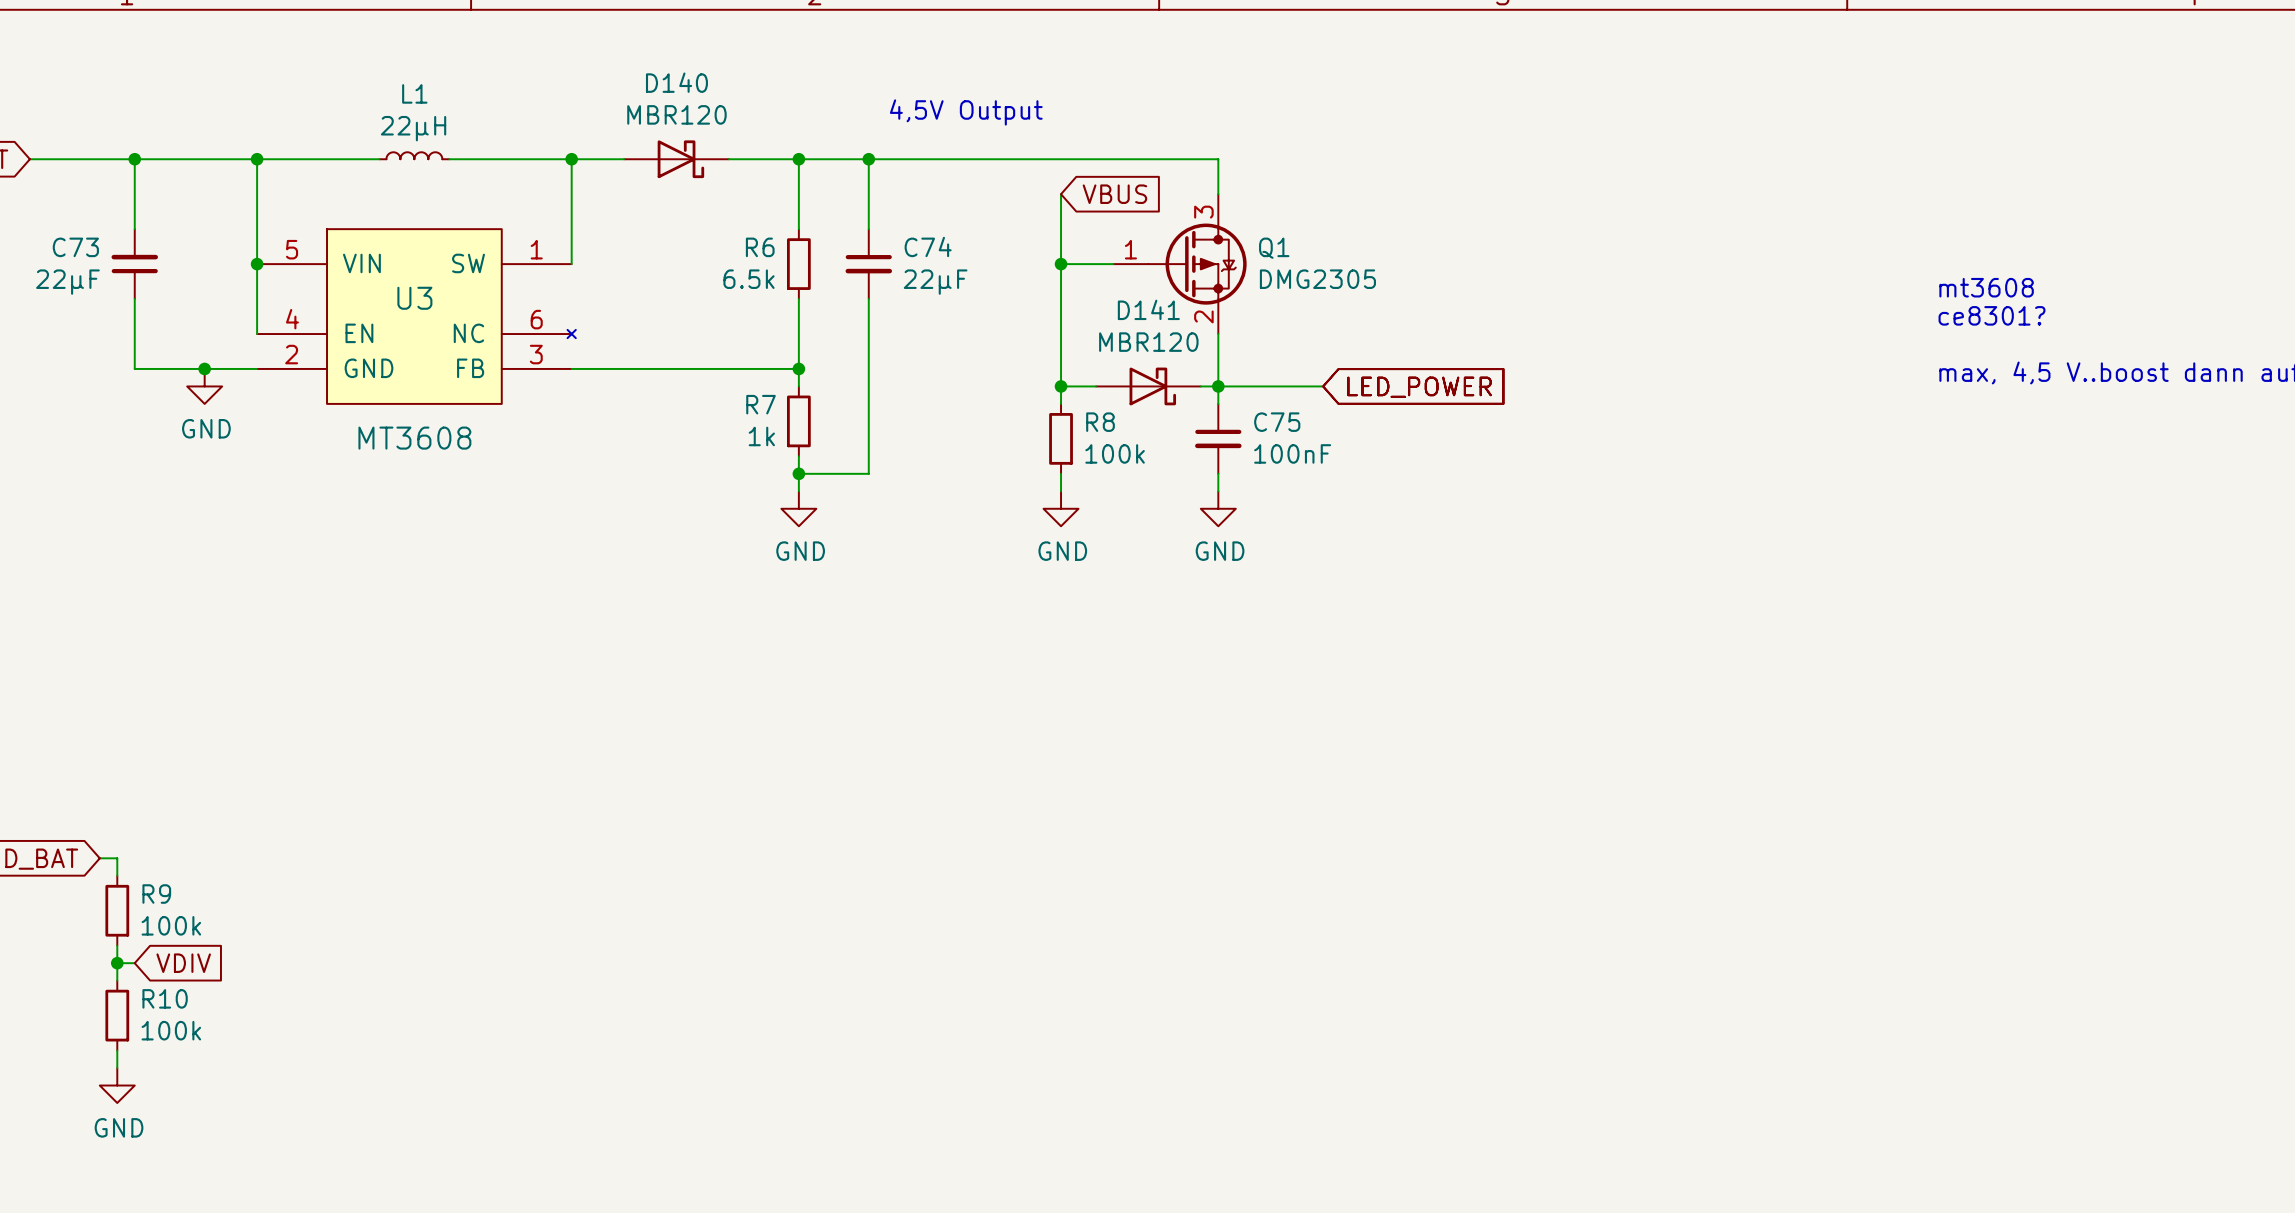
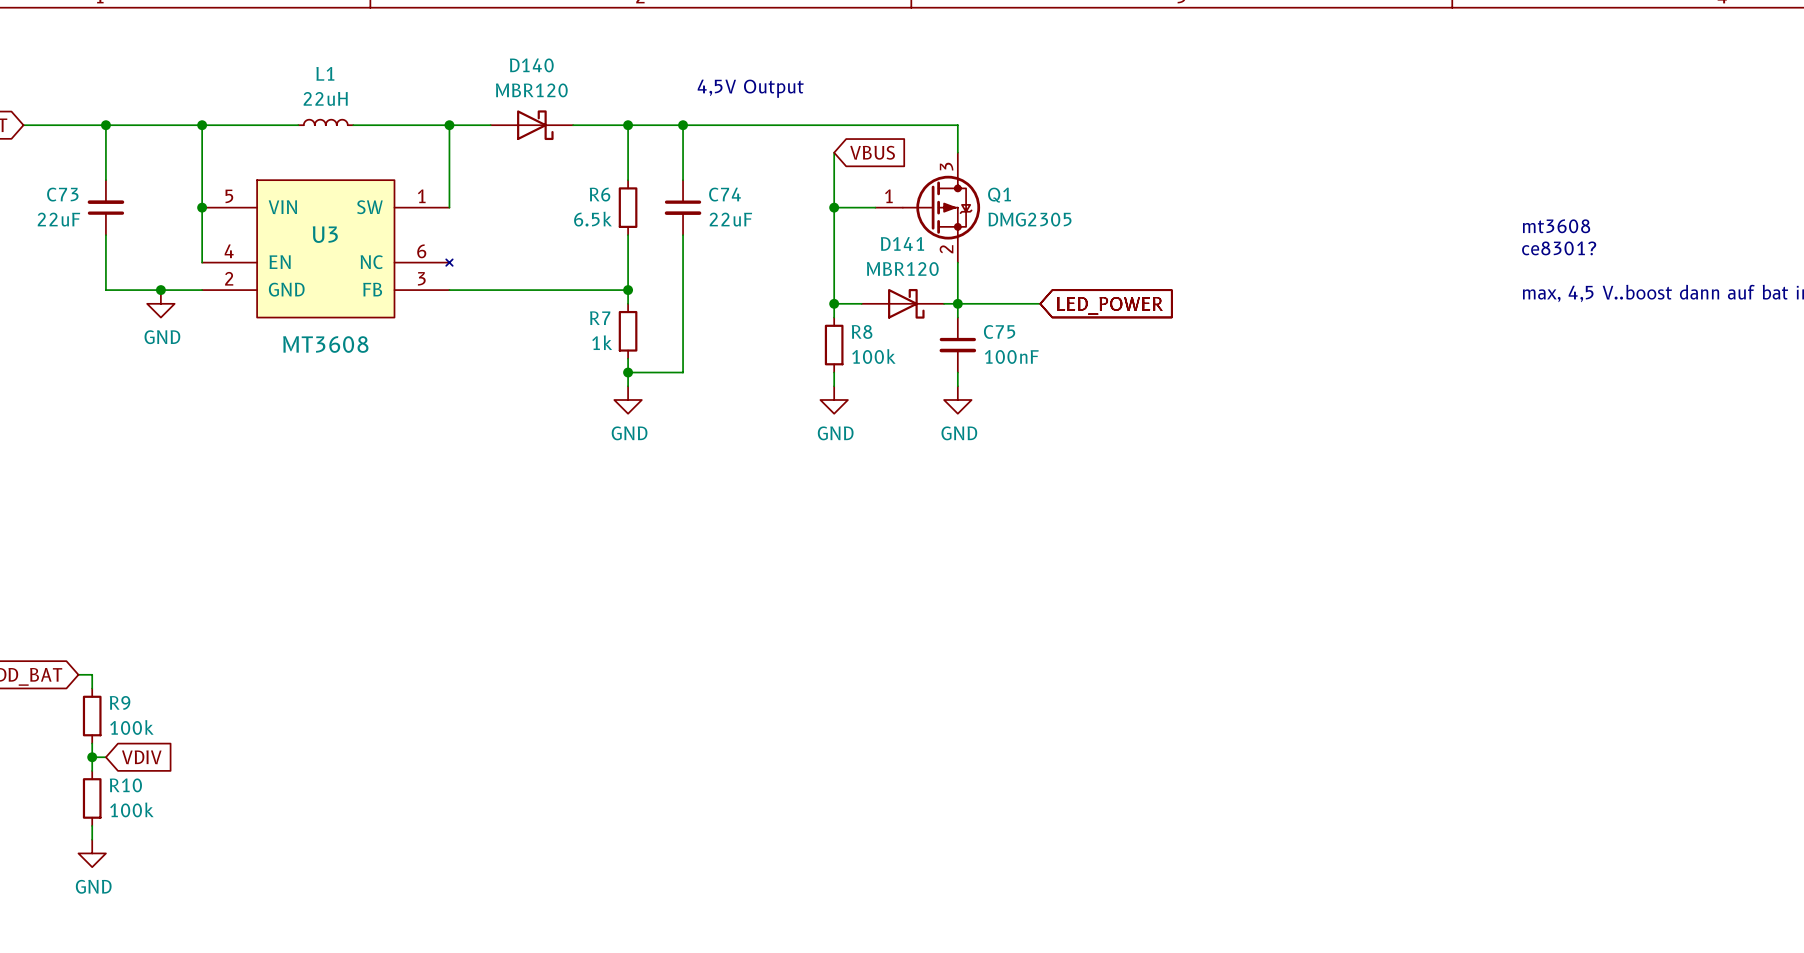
L1 value: 22µH (413, 128) -> 22uH (325, 98)
C73 value: 22µF (67, 282) -> 22uF (58, 219)
C74 value: 22µF (935, 282) -> 22uF (730, 219)

